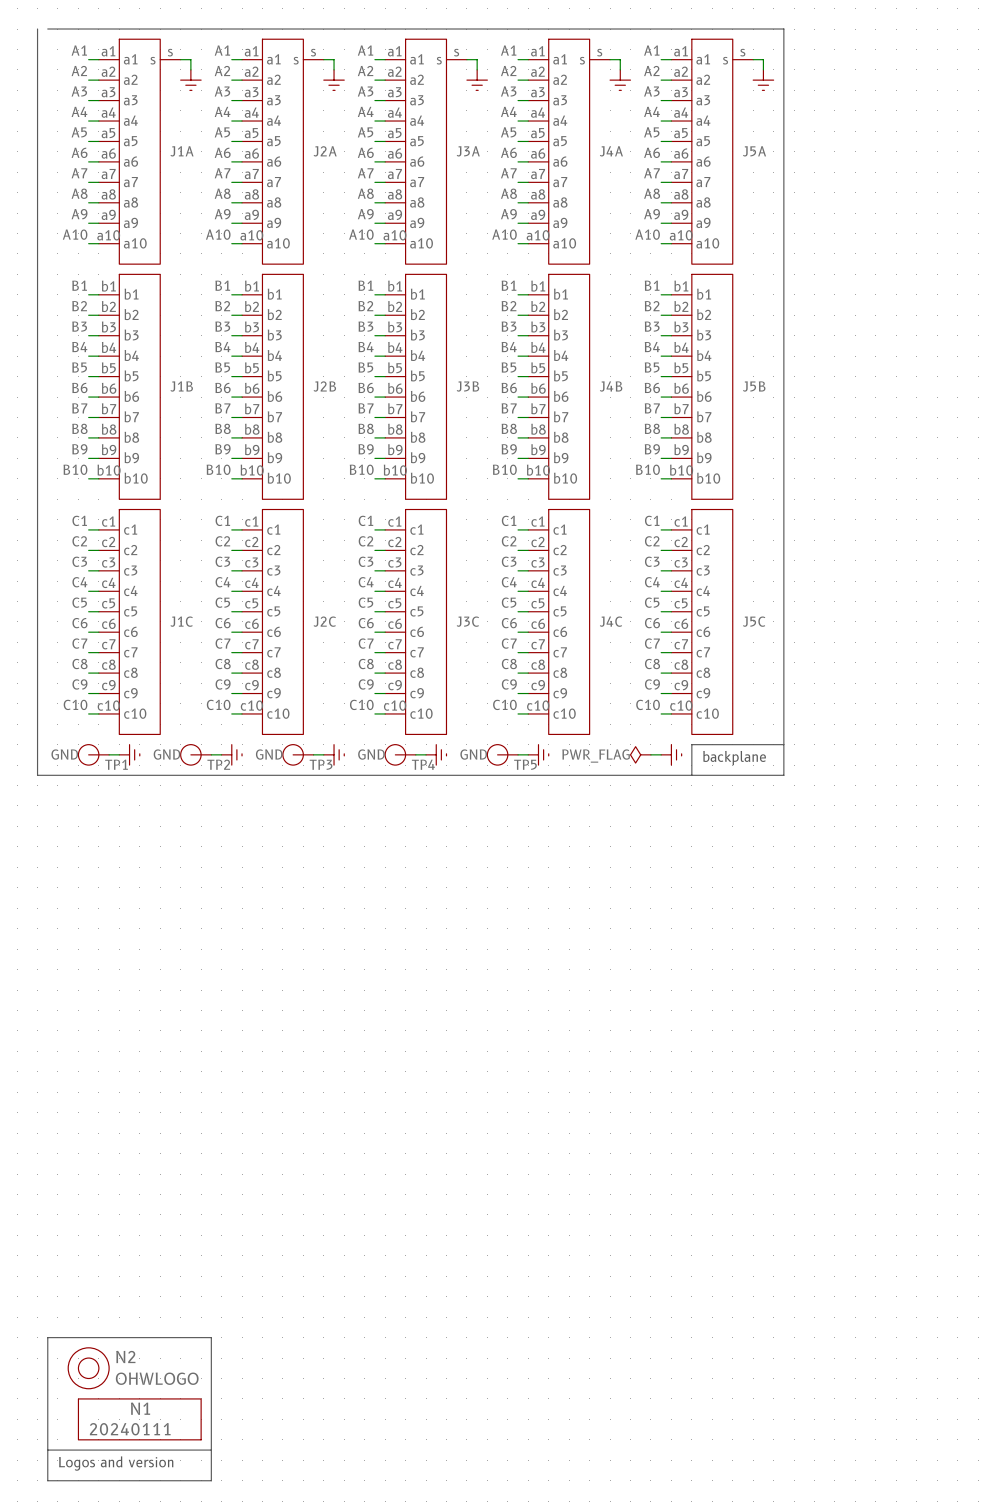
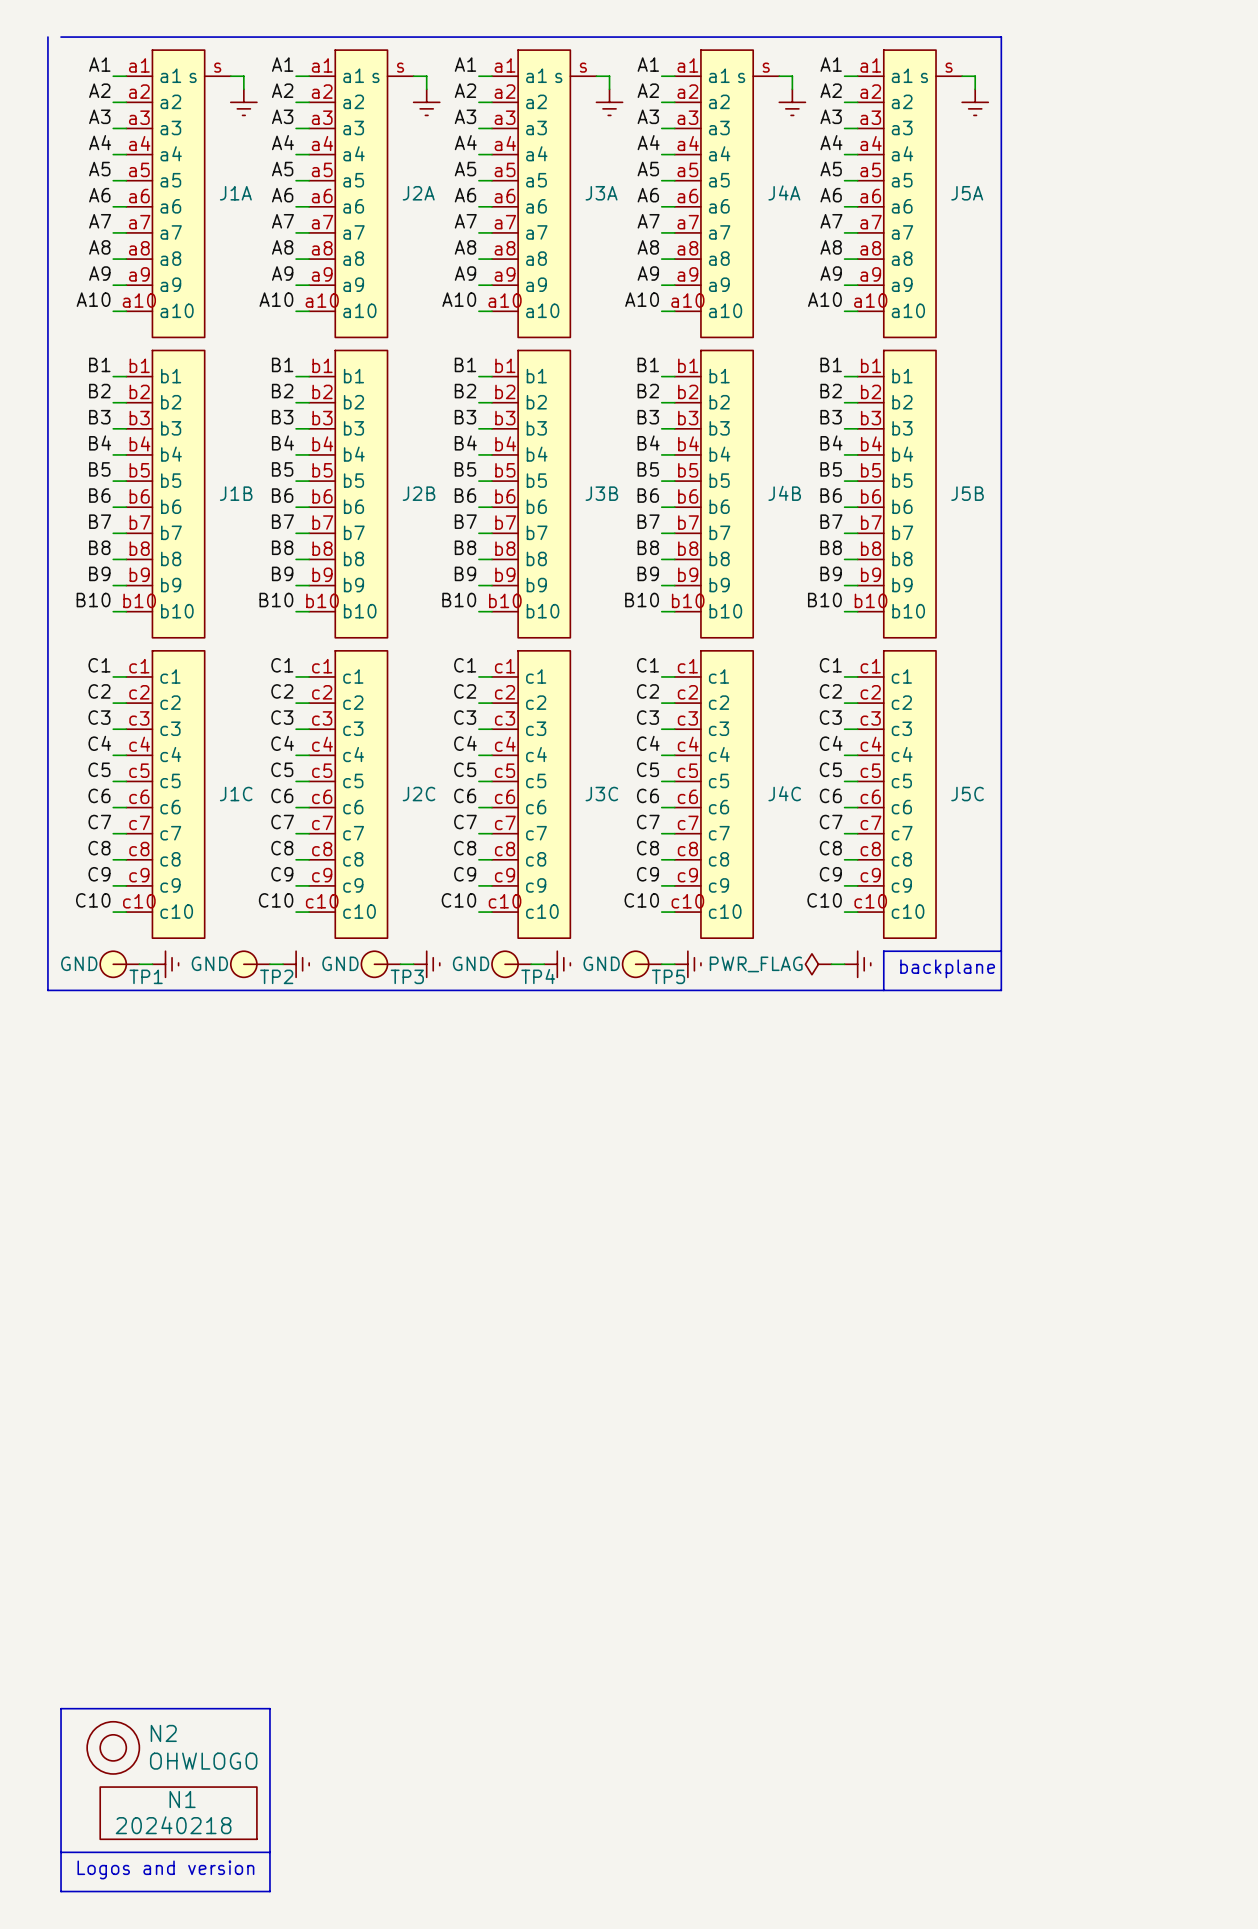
N1 value: 20240111 (130, 1429) -> 20240218 (173, 1825)

